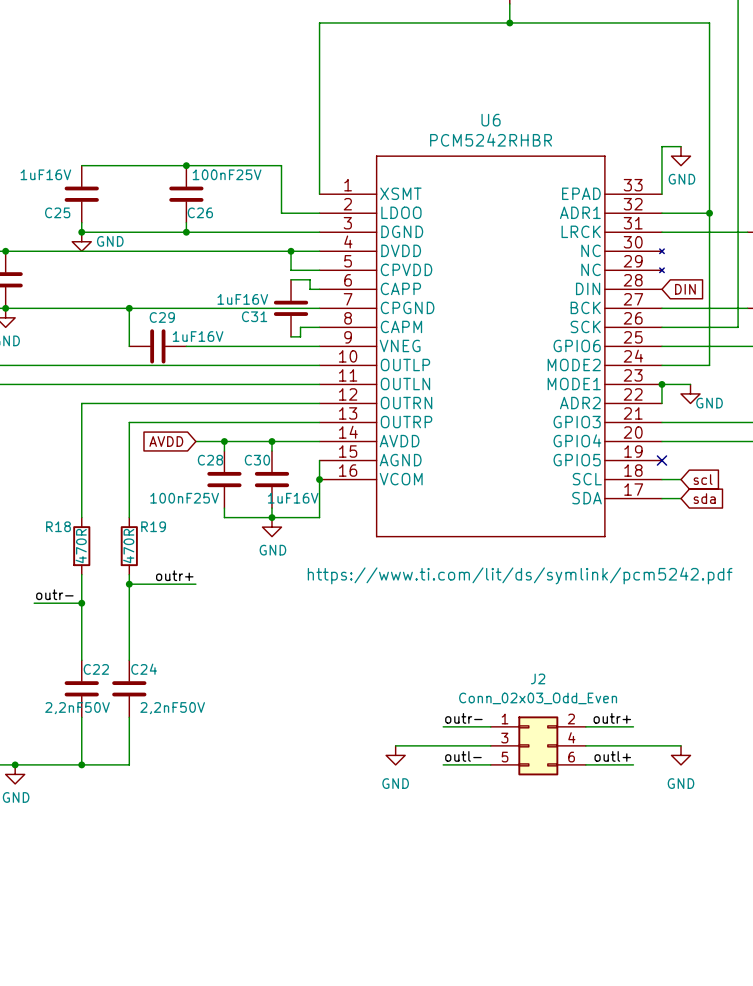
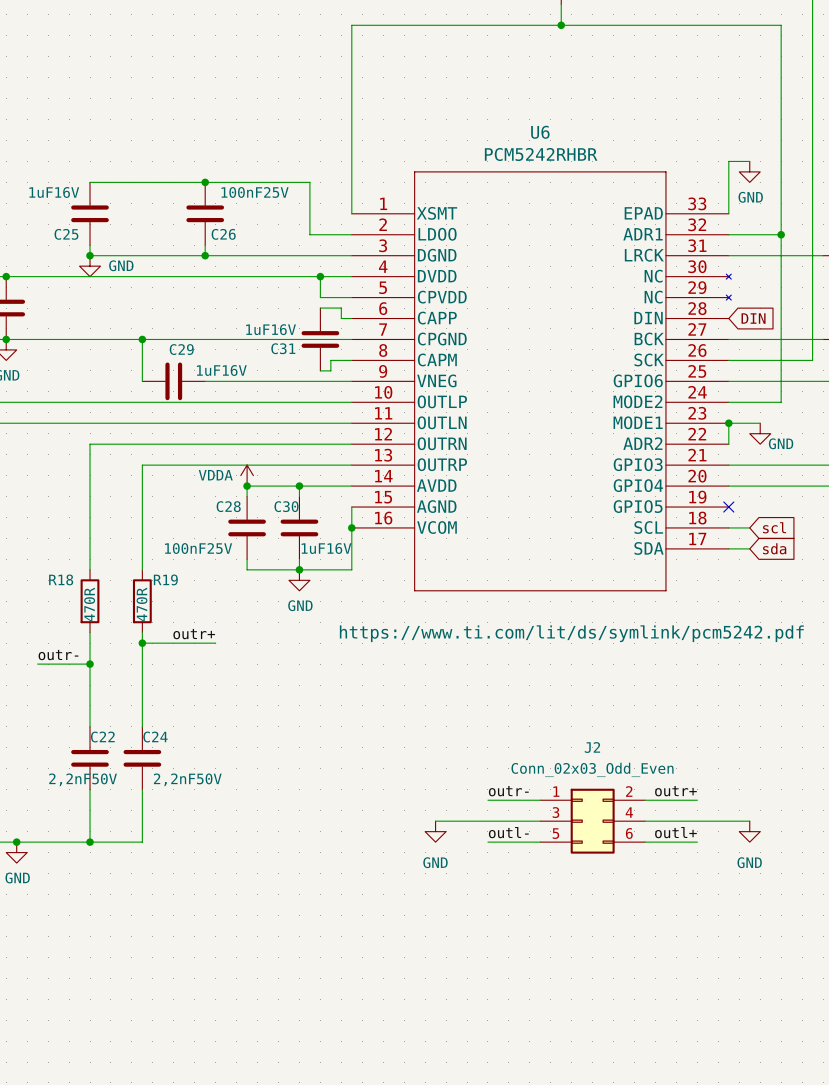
power symbol: none -> VDDA (247, 475)
global label: AVDD (166, 441) -> none
wire: (195, 441) (224, 441) -> none

